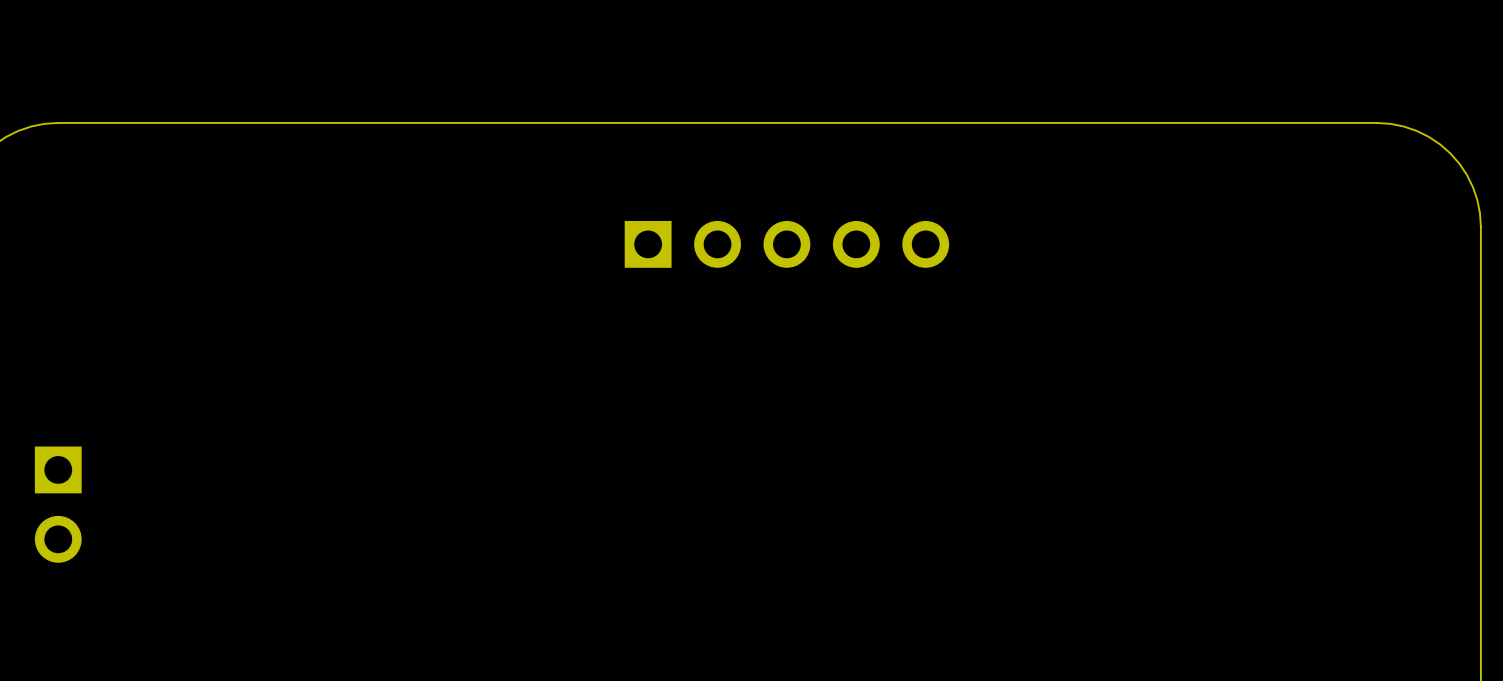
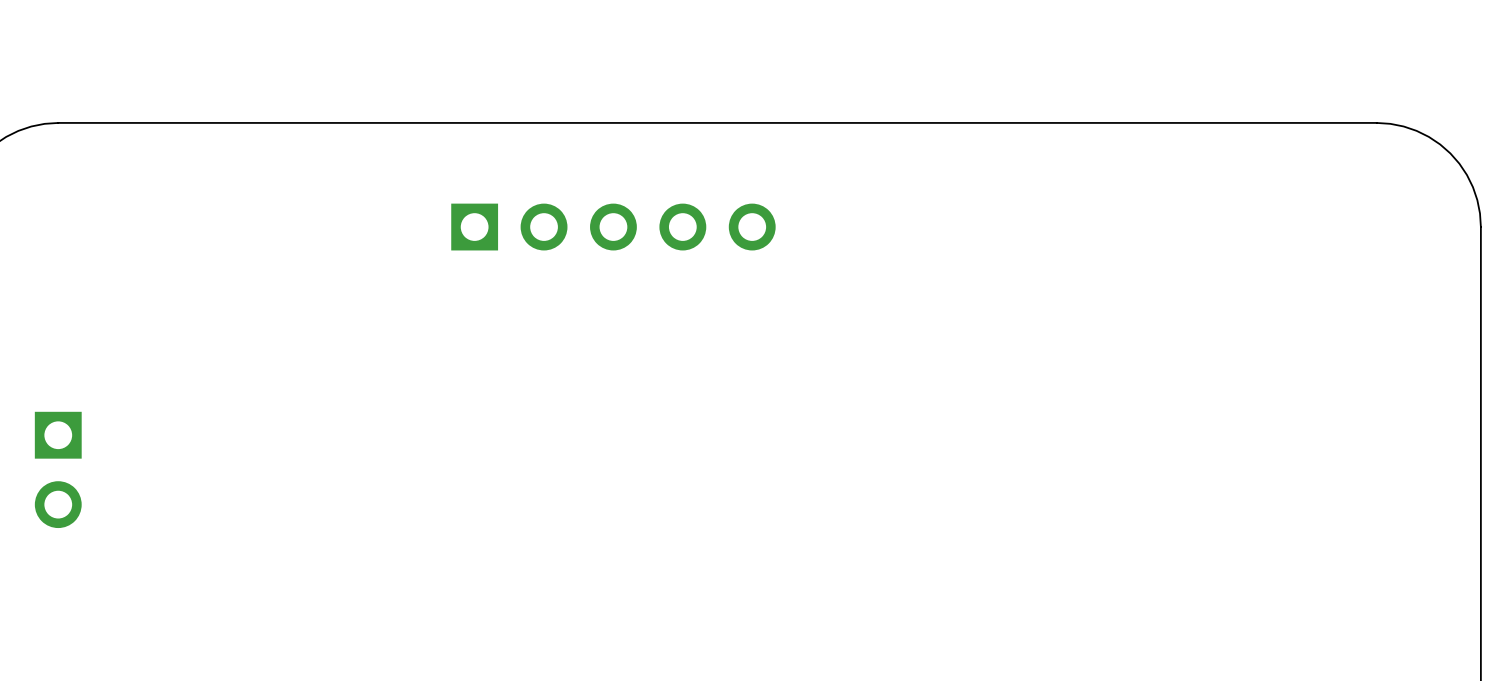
part position: (786, 244) -> (613, 227)
part position: (58, 504) -> (58, 469)

